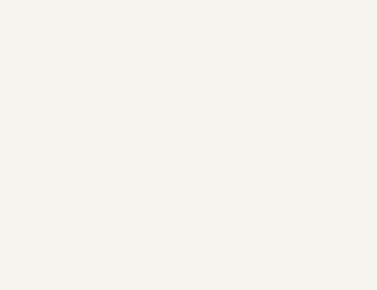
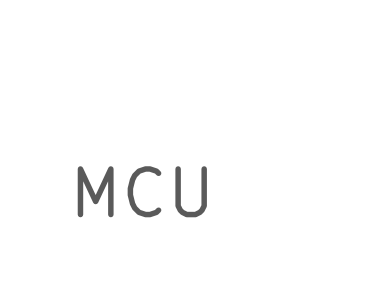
text: none -> MCU (142, 191)

